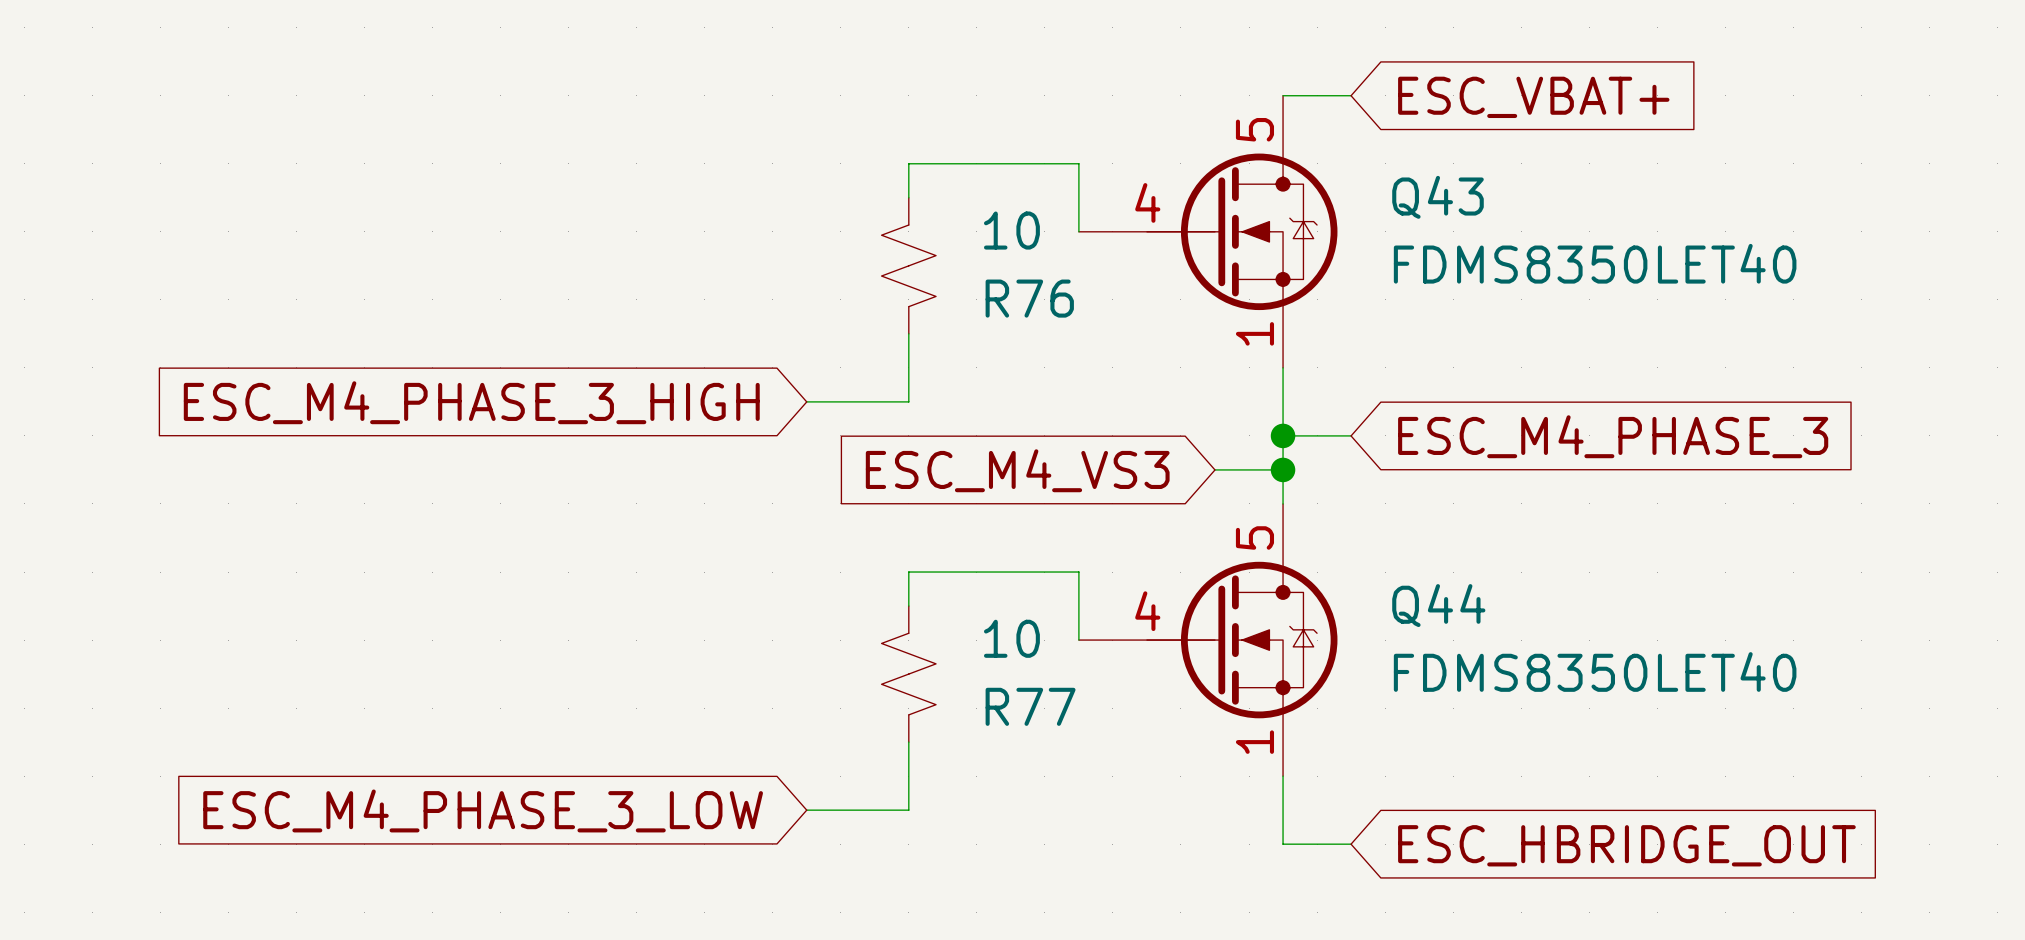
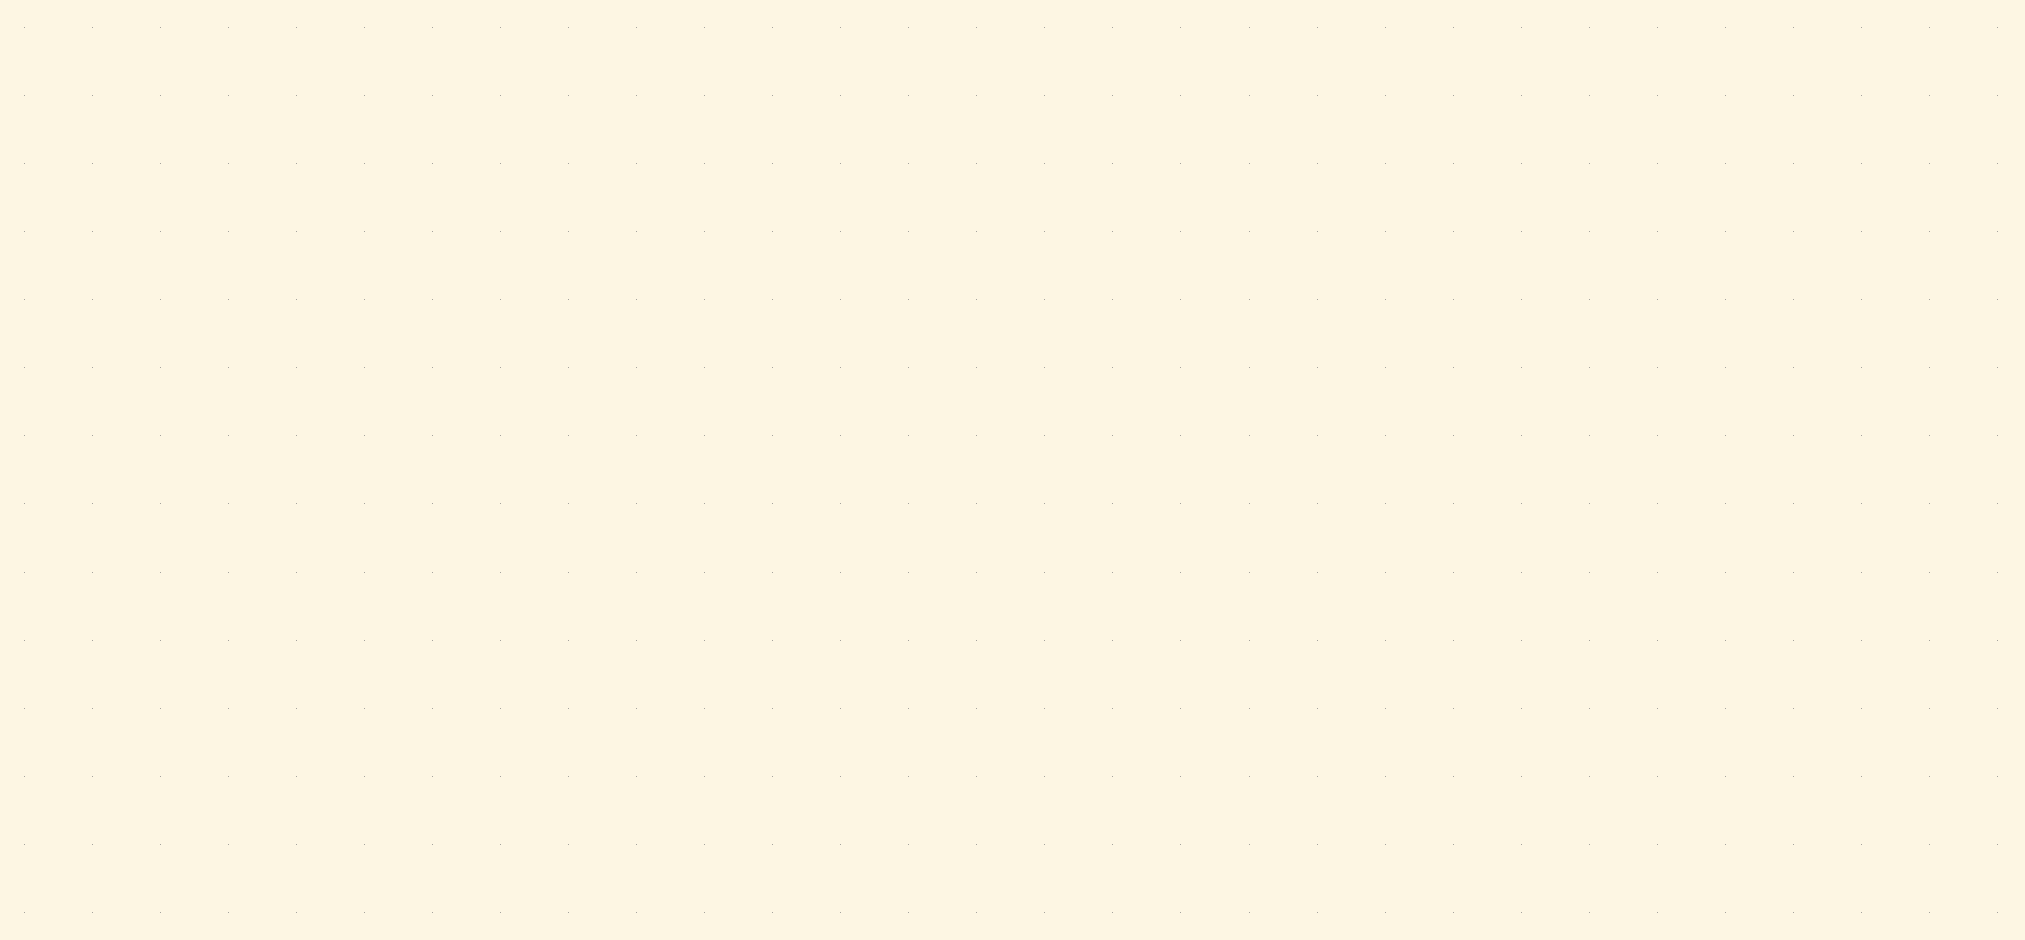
wire: (1283, 95) (1351, 95) -> none
global label: ESC_VBAT+ (1533, 97) -> none
wire: (908, 197) (908, 163) (1078, 163) (1078, 231) -> none
Q43: FDMS8350LET40 (1208, 231) -> none
R76: 10 (908, 265) -> none
wire: (908, 333) (908, 401) (806, 401) -> none
wire: (1283, 367) (1283, 503) -> none
global label: ESC_M4_PHASE_3_HIGH (471, 402) -> none
wire: (1283, 435) (1351, 435) -> none
junction: (1283, 435) -> none
global label: ESC_M4_PHASE_3 (1613, 436) -> none
wire: (1214, 469) (1283, 469) -> none
junction: (1283, 469) -> none
global label: ESC_M4_VS3 (1017, 470) -> none
wire: (908, 606) (908, 572) (1078, 572) (1078, 640) -> none
Q44: FDMS8350LET40 (1208, 640) -> none
R77: 10 (908, 674) -> none
wire: (908, 742) (908, 810) (806, 810) -> none
wire: (1283, 776) (1283, 844) (1351, 844) -> none
global label: ESC_M4_PHASE_3_LOW (483, 810) -> none
global label: ESC_HBRIDGE_OUT (1626, 845) -> none

